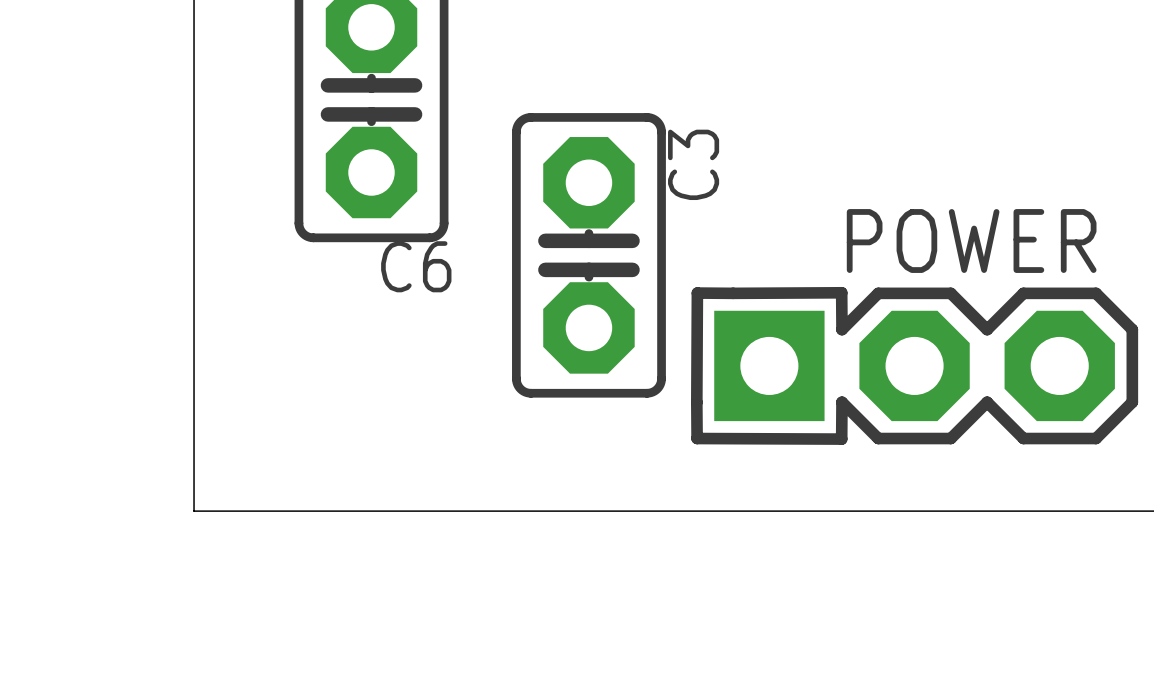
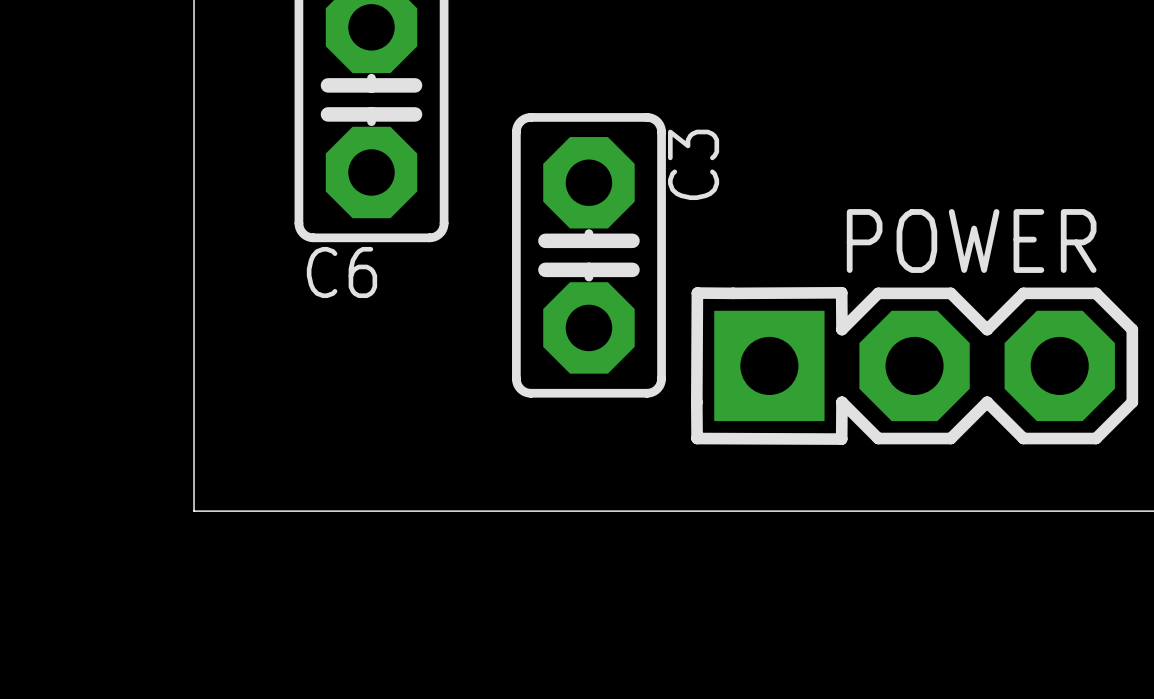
C6 name position: C6 (416, 266) -> C6 (341, 272)

